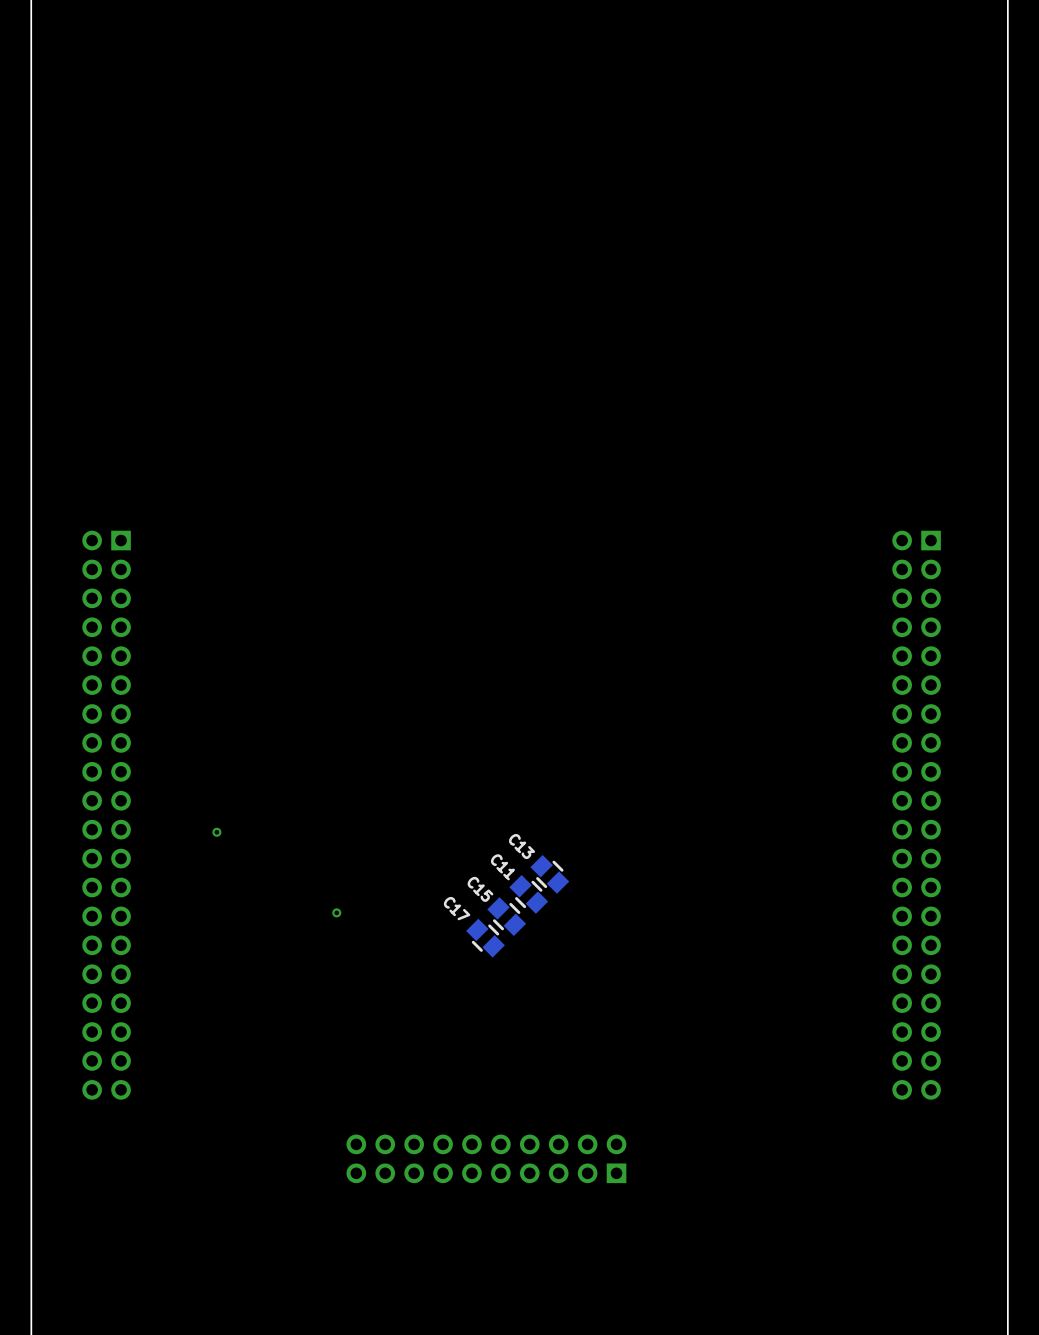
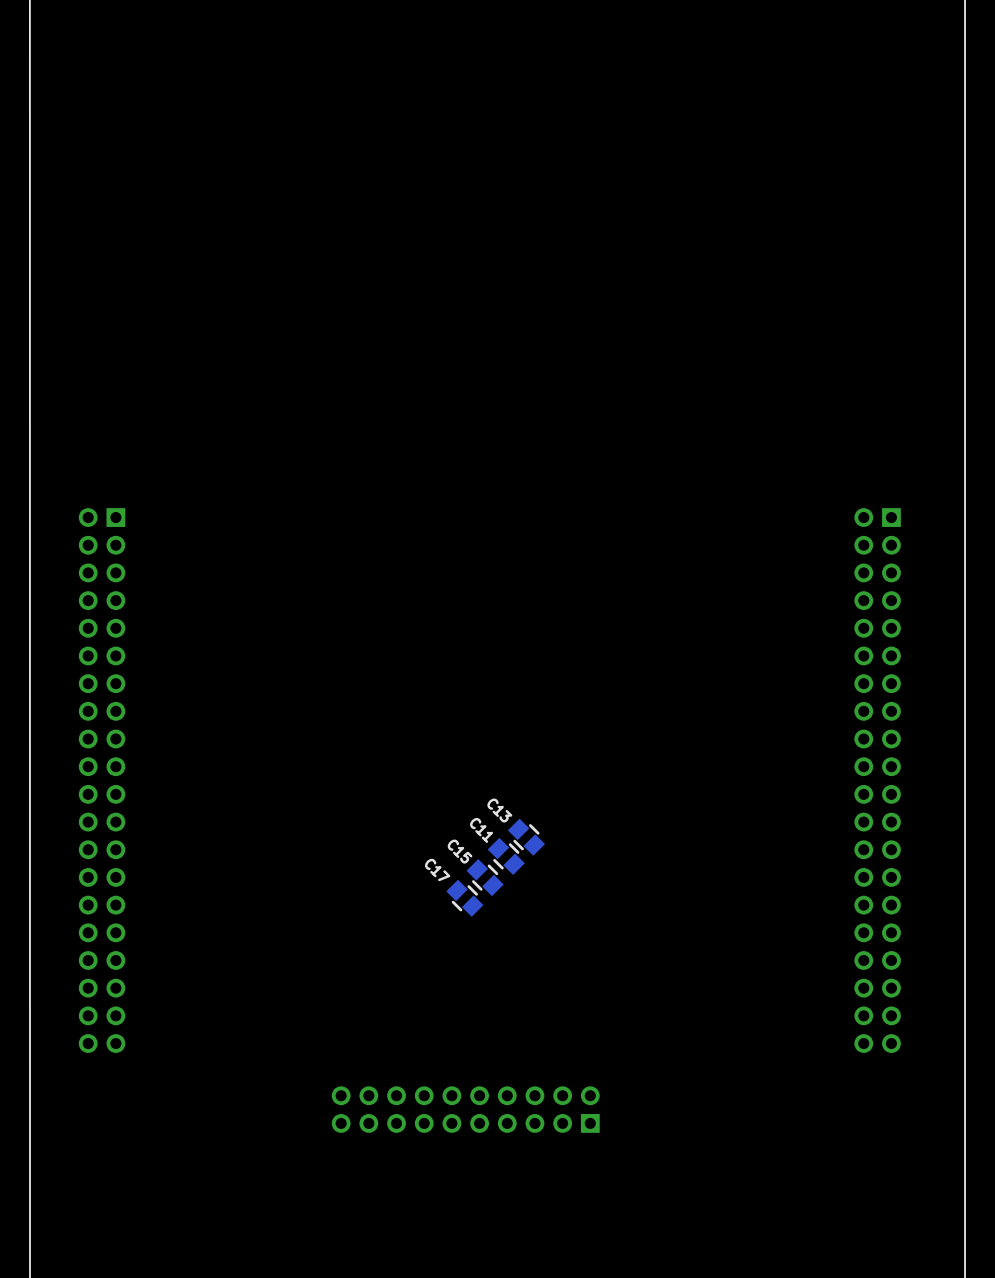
via: (216, 832) -> none
via: (336, 912) -> none

